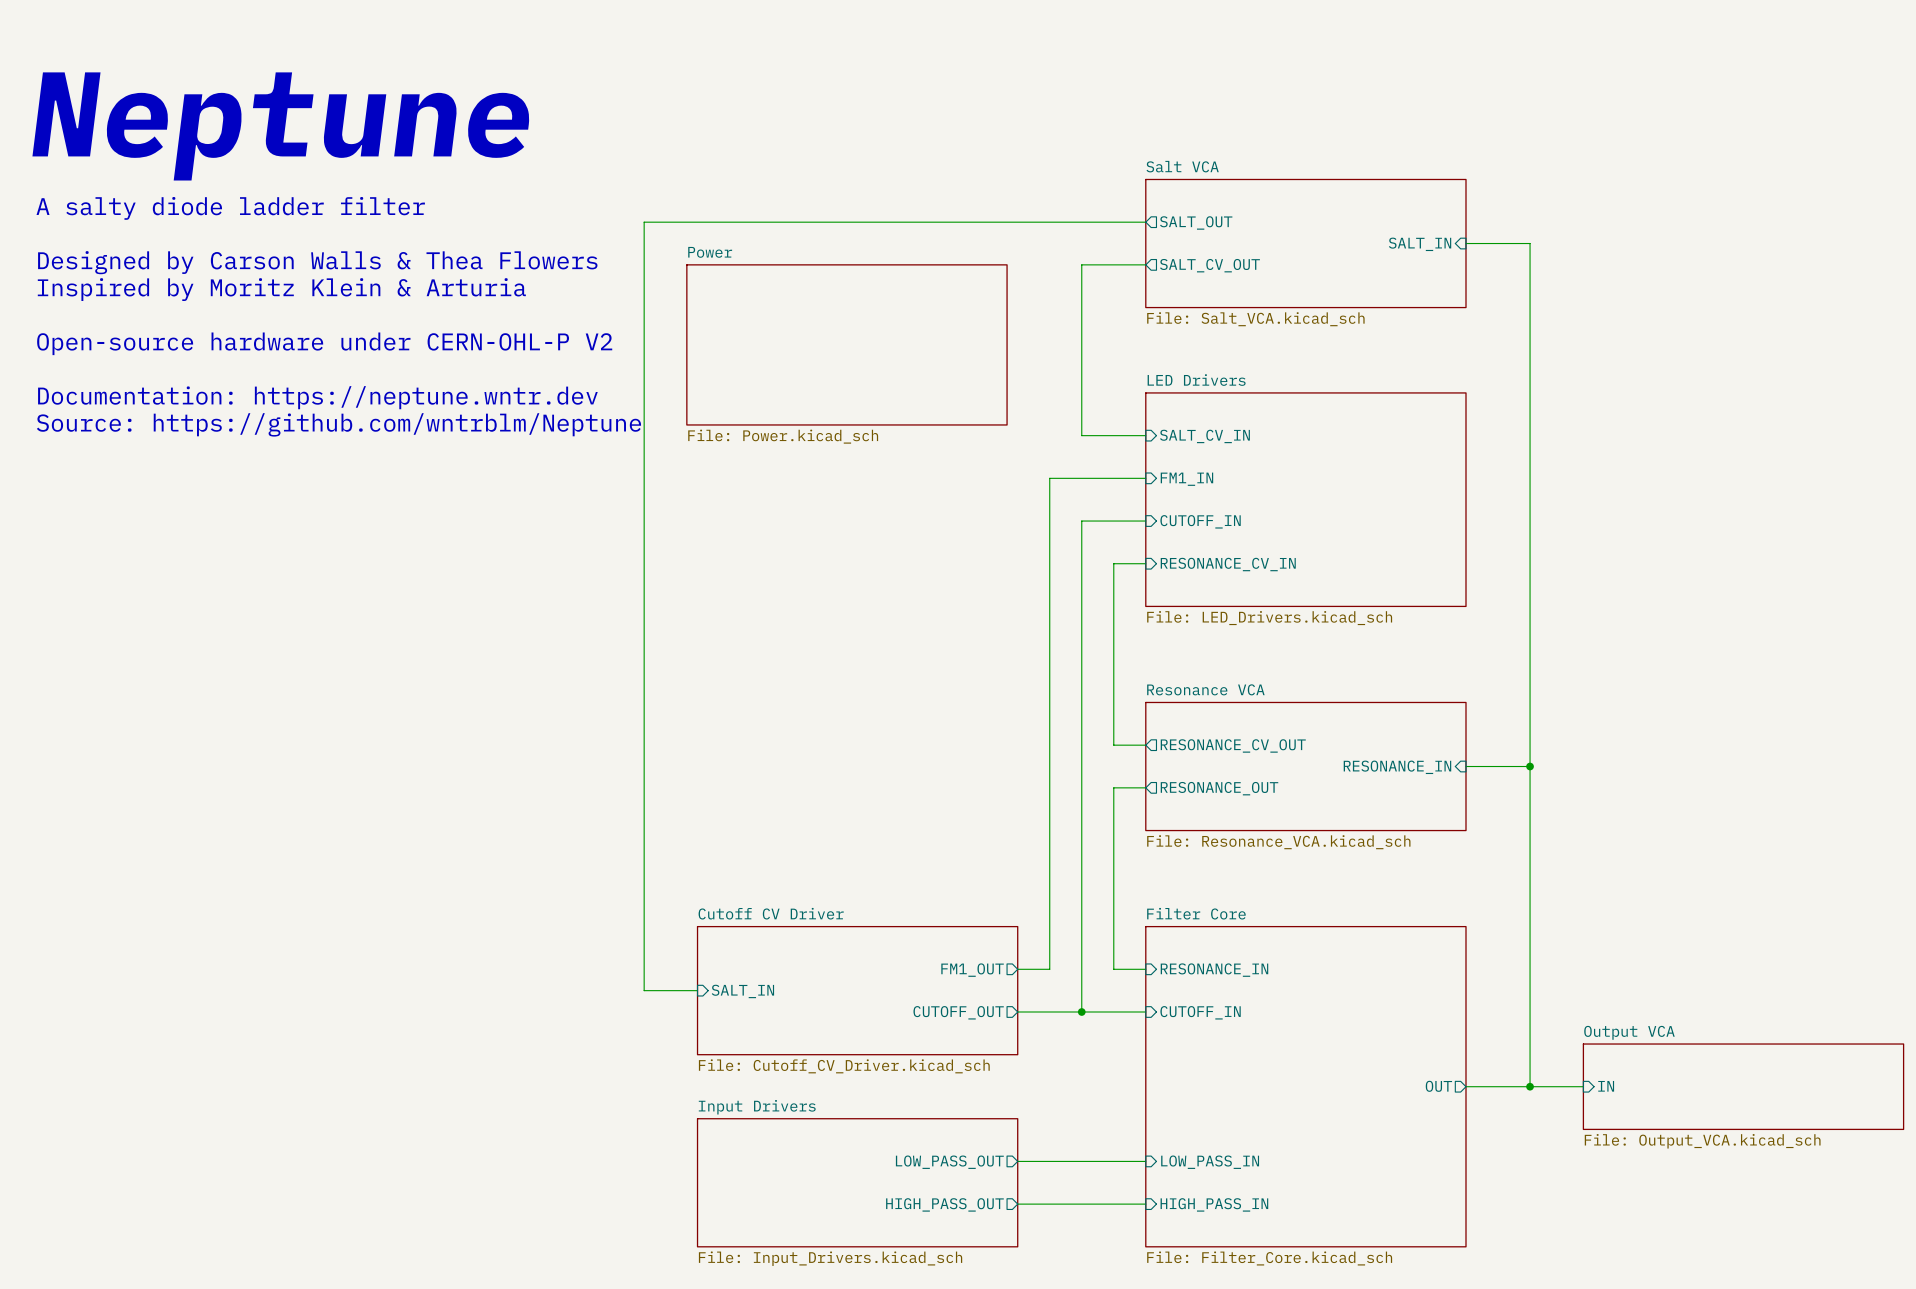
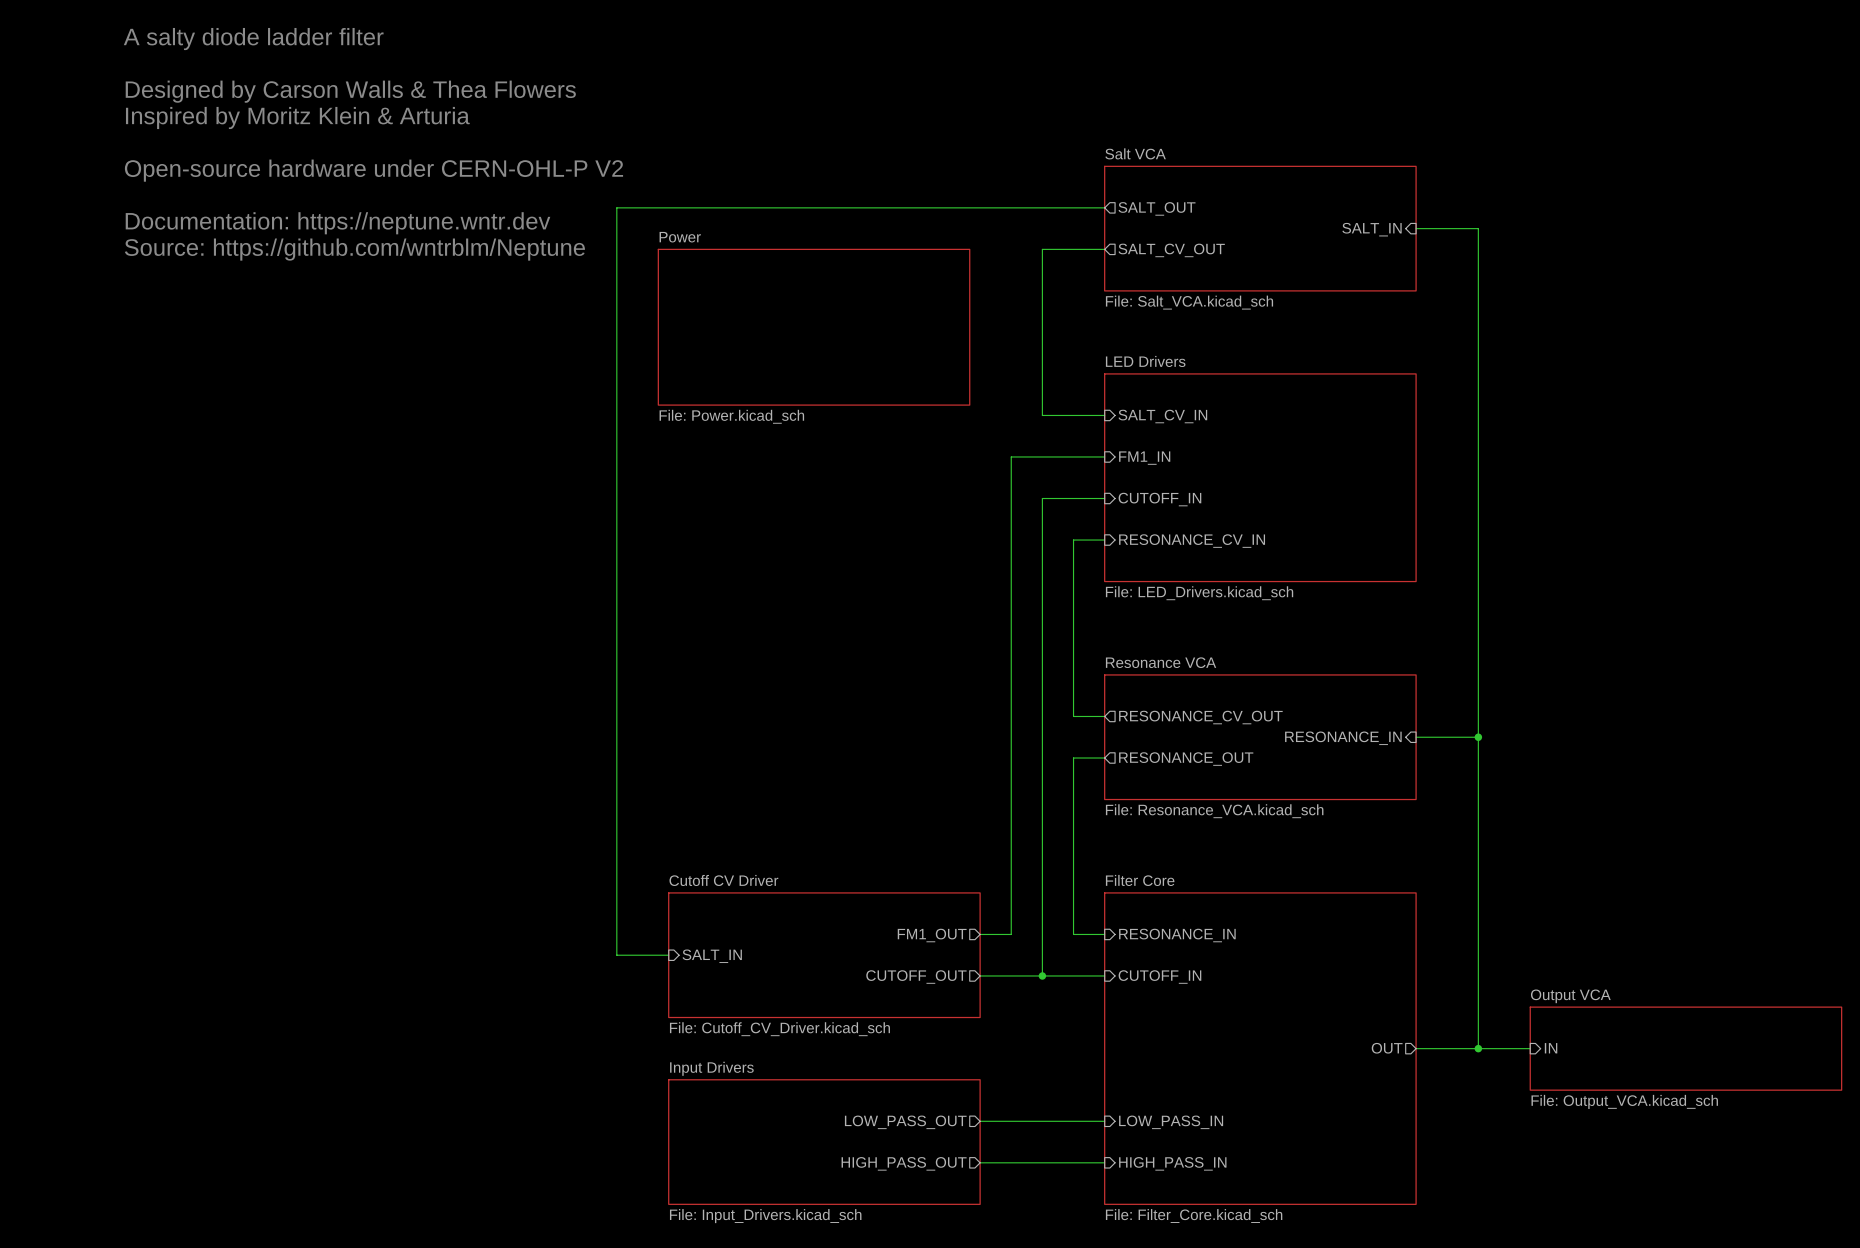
text: Neptune (281, 126) -> none
text position: A salty diode ladder filter (230, 208) -> A salty diode ladder filter (253, 39)
text position: Designed by Carson Walls & Thea Flowers (317, 262) -> Designed by Carson Walls & Thea Flowers (350, 91)
text position: Inspired by Moritz Klein & Arturia (281, 289) -> Inspired by Moritz Klein & Arturia (297, 117)
text position: Open-source hardware under CERN-OHL-P V2 (324, 343) -> Open-source hardware under CERN-OHL-P V2 (373, 170)
text position: Documentation: https://neptune.wntr.dev (317, 397) -> Documentation: https://neptune.wntr.dev (338, 223)
text position: Source: https://github.com/wntrblm/Neptune (338, 424) -> Source: https://github.com/wntrblm/Neptune (354, 249)

